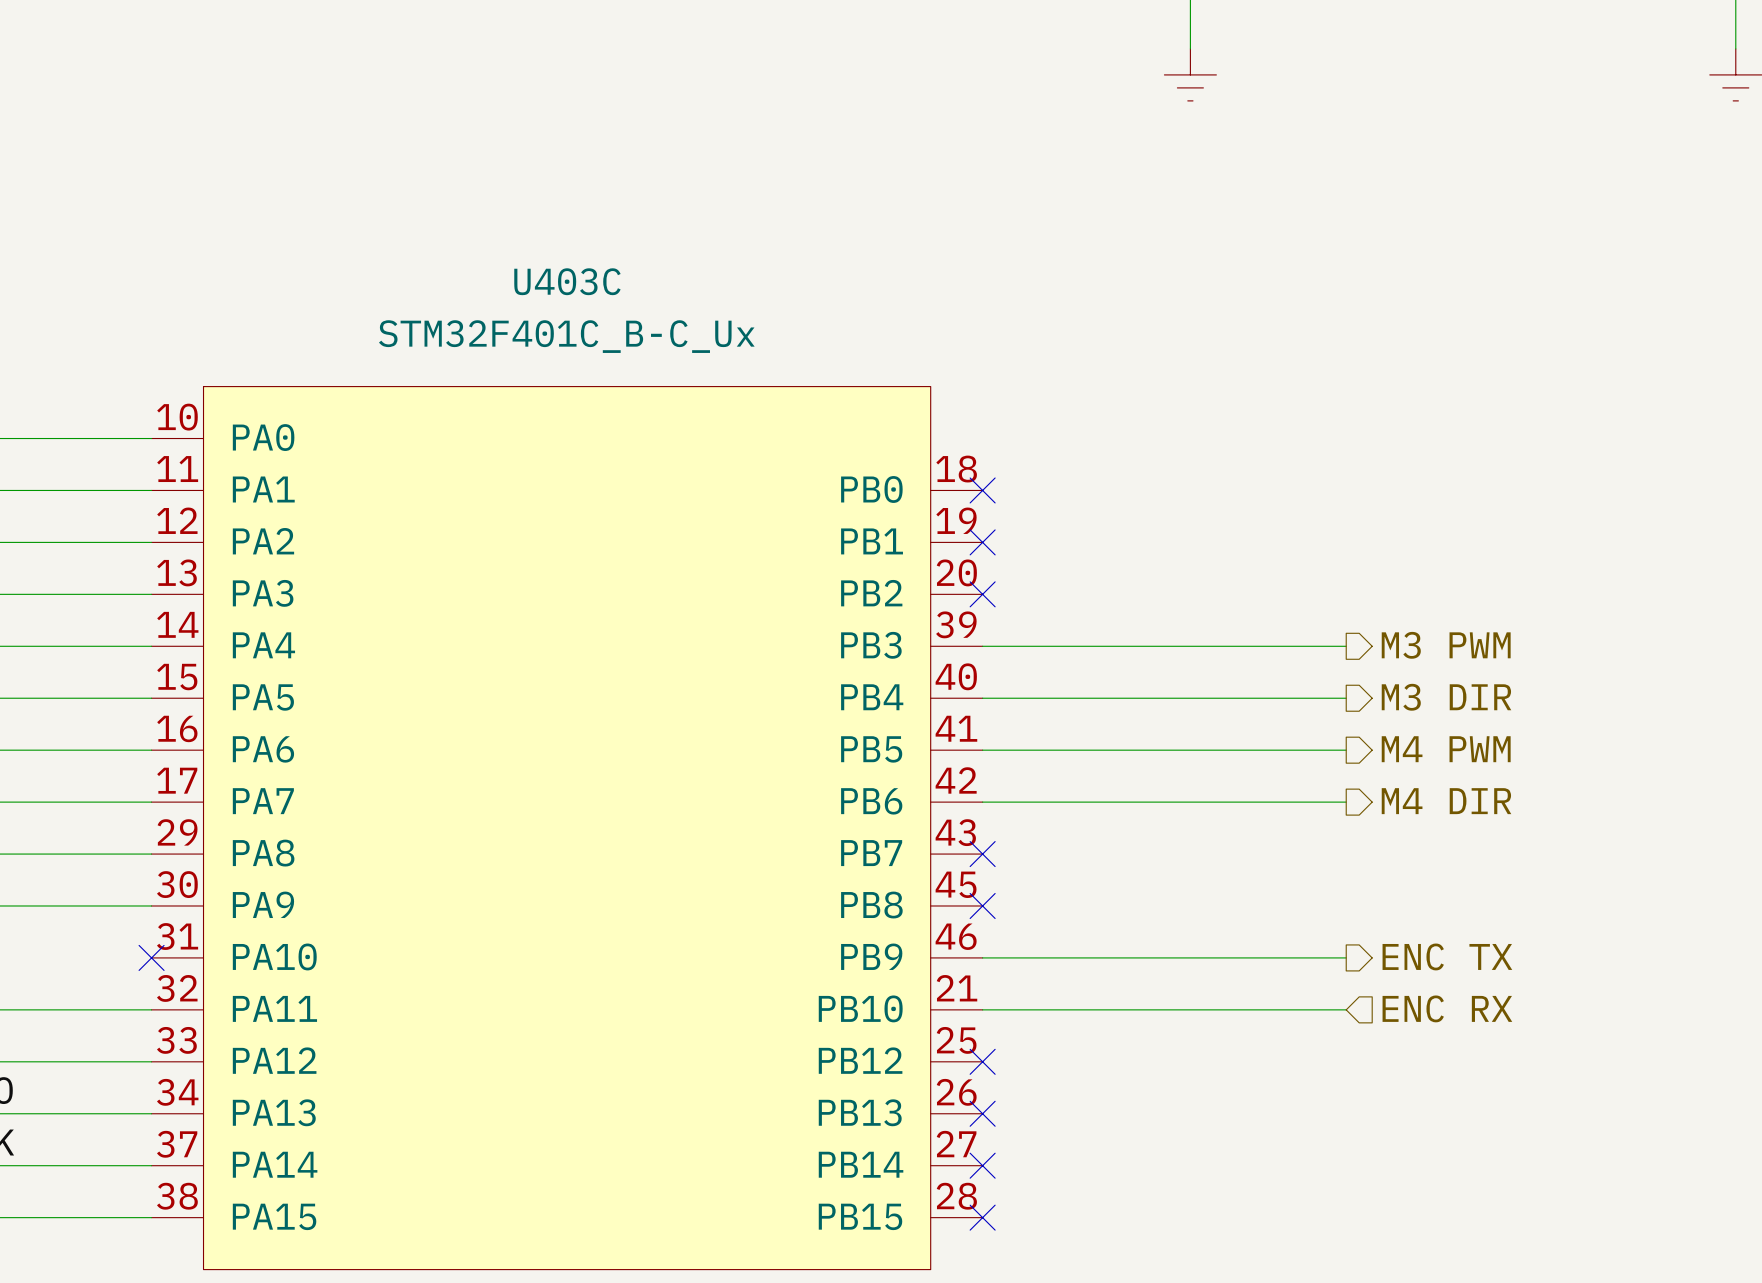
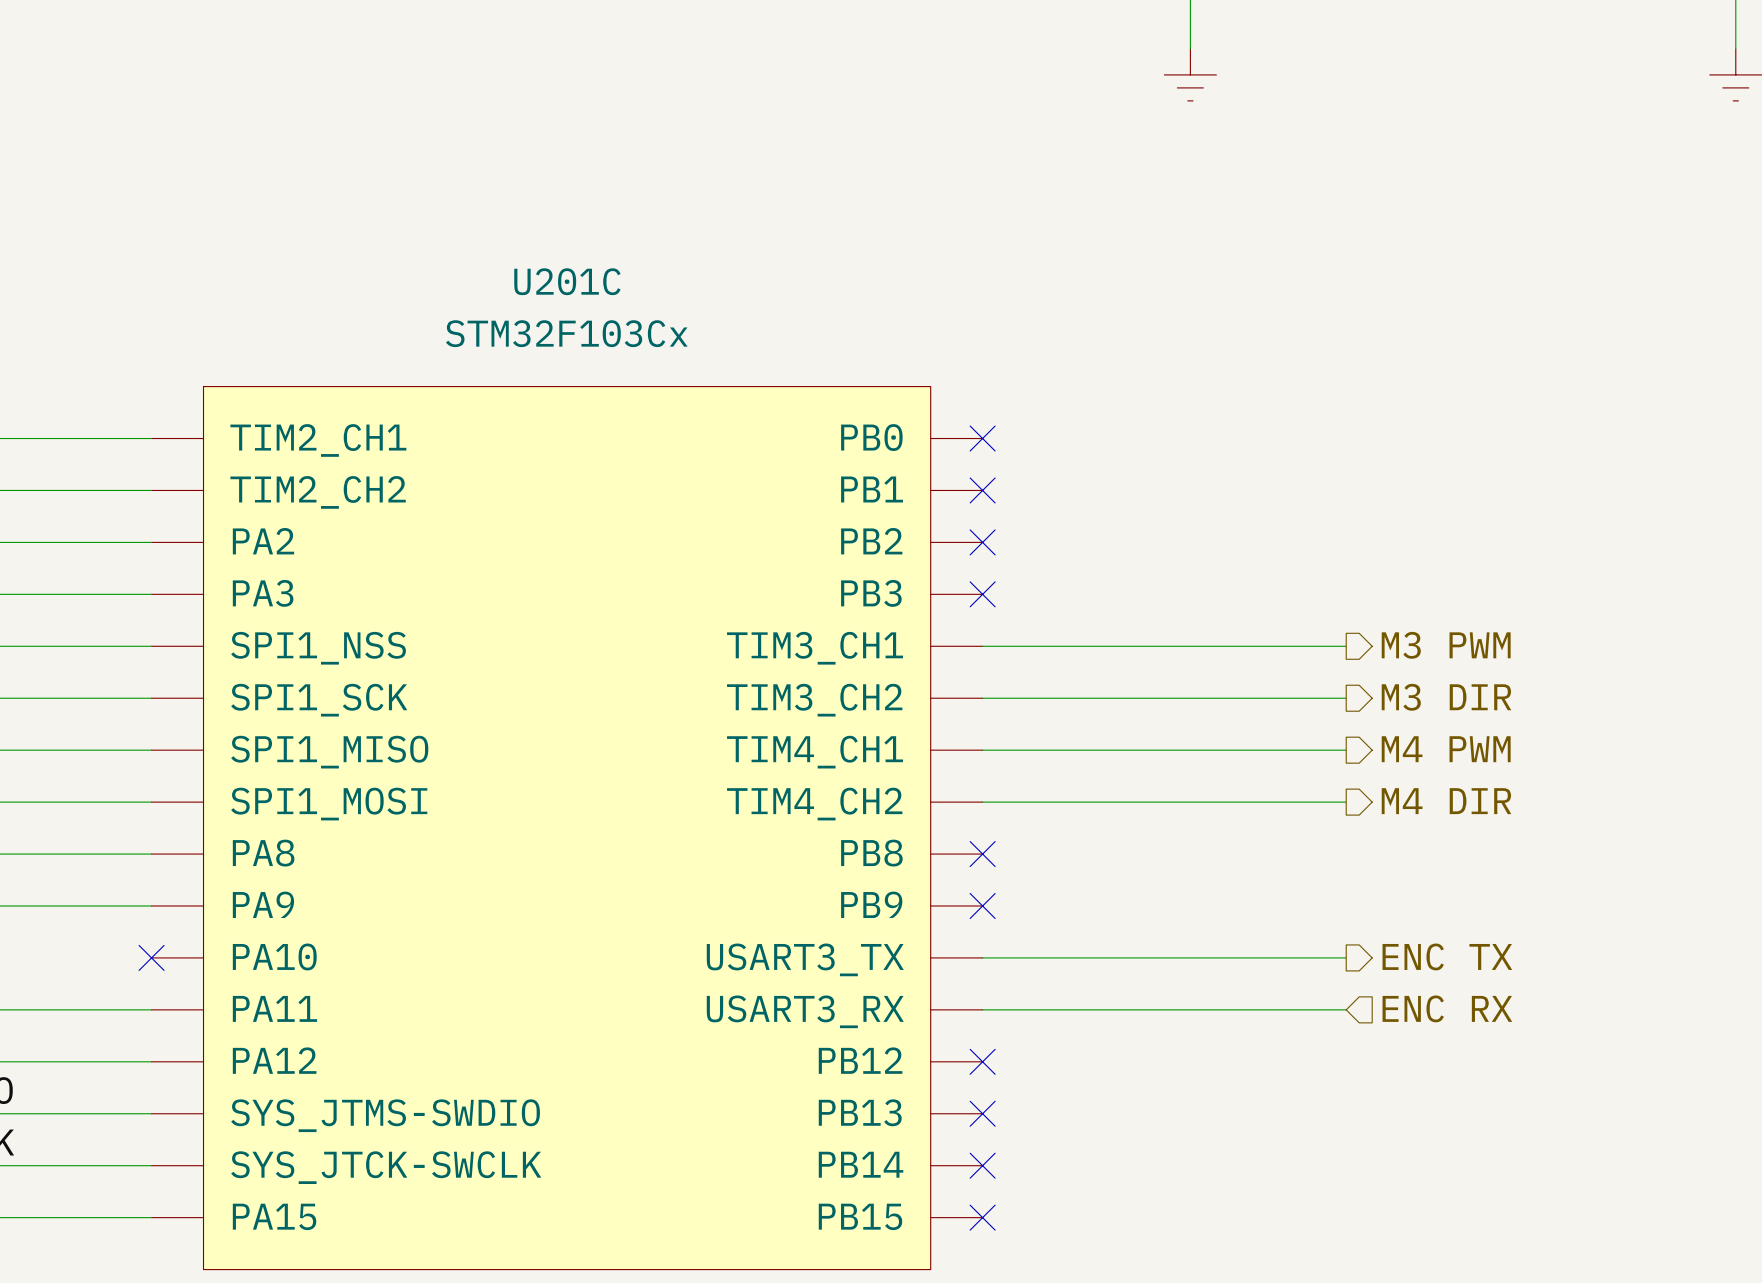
no-connect mark: none -> (982, 438)
U403C: STM32F401C_B-C_Ux (567, 828) -> none
U201C: none -> STM32F103Cx (567, 828)

